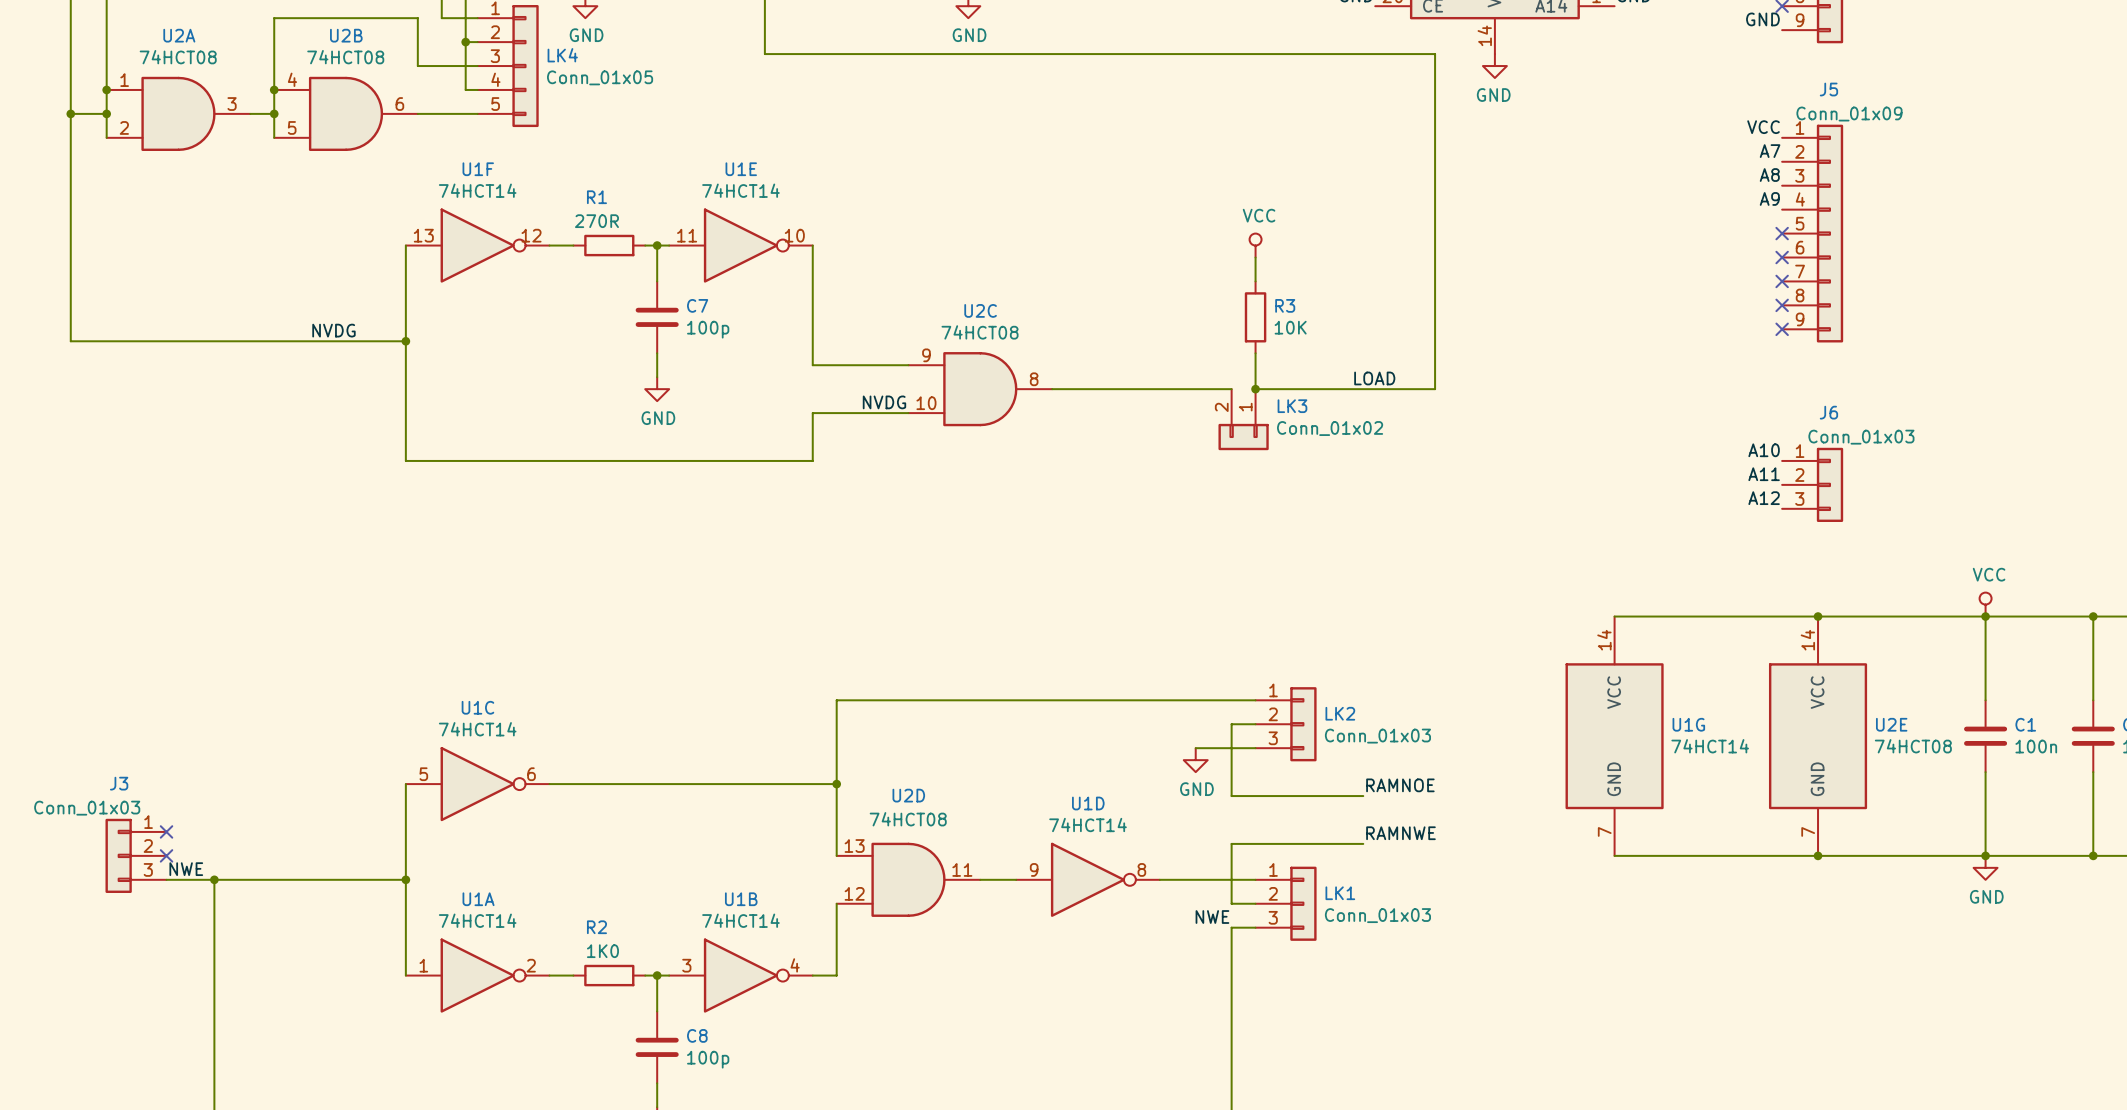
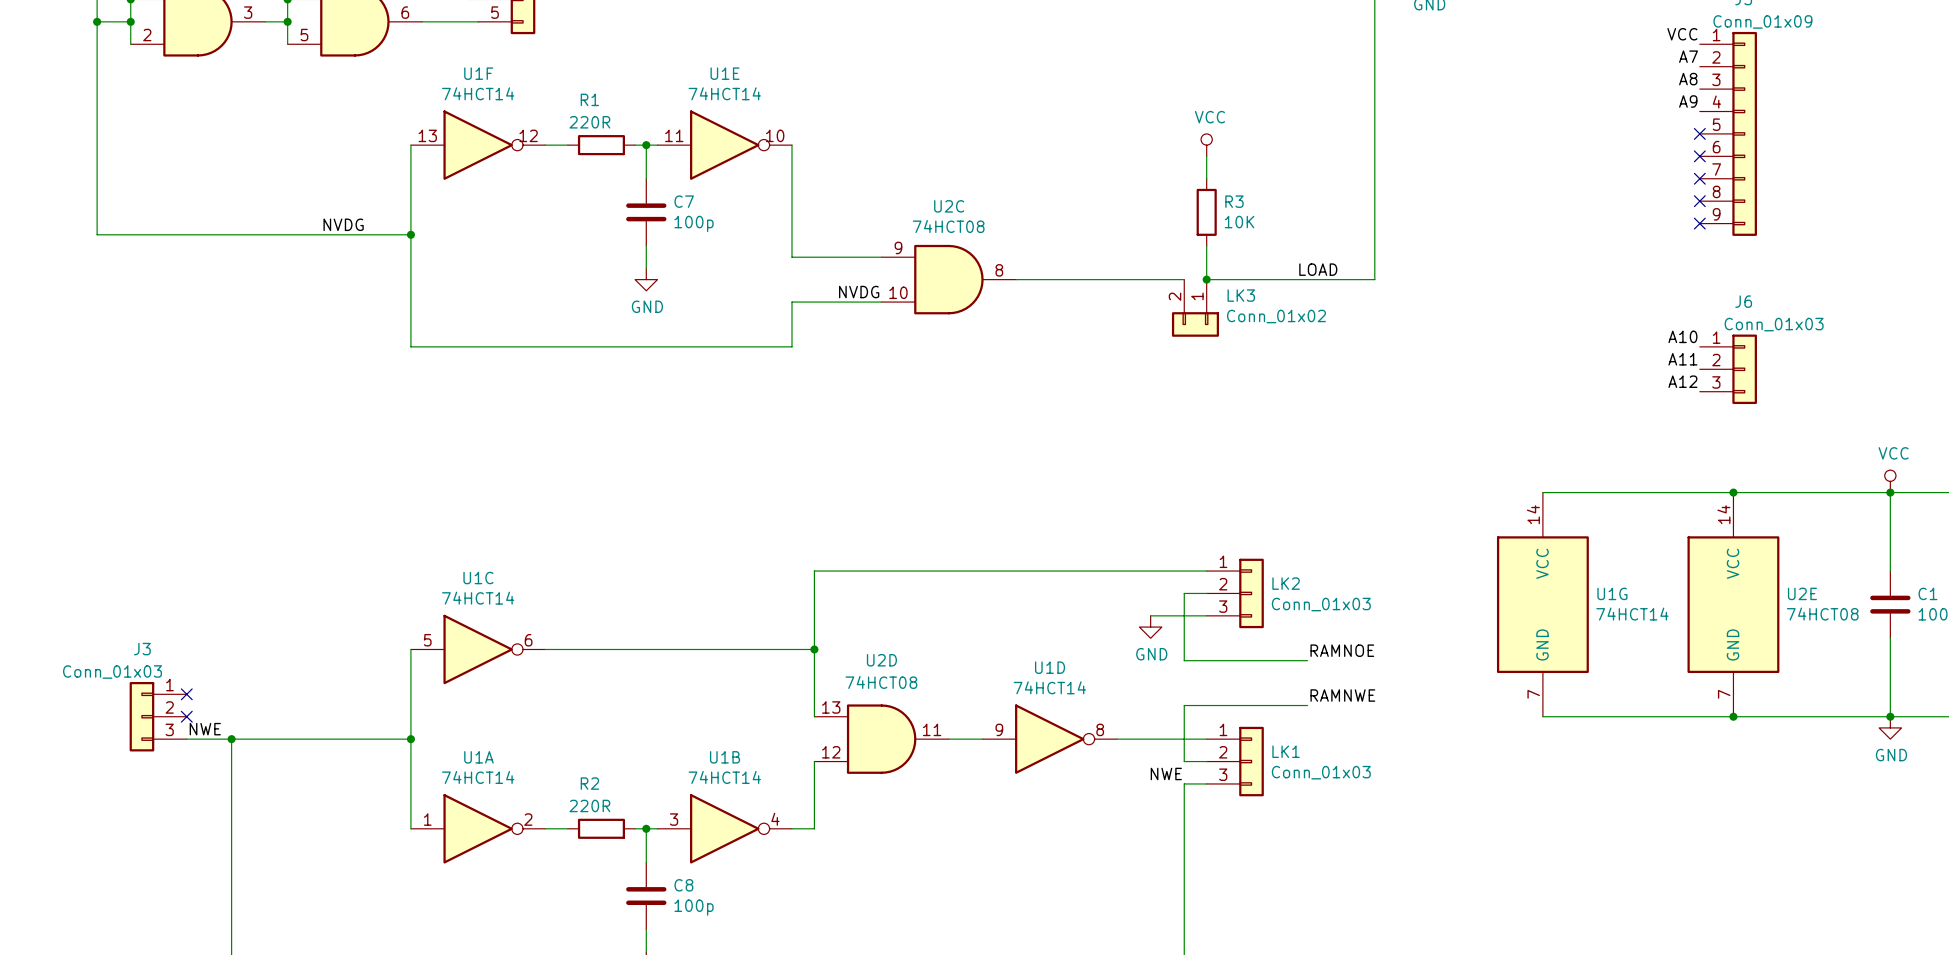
R1 value: 270R (596, 221) -> 220R (589, 122)
R2 value: 1K0 (602, 951) -> 220R (589, 805)

